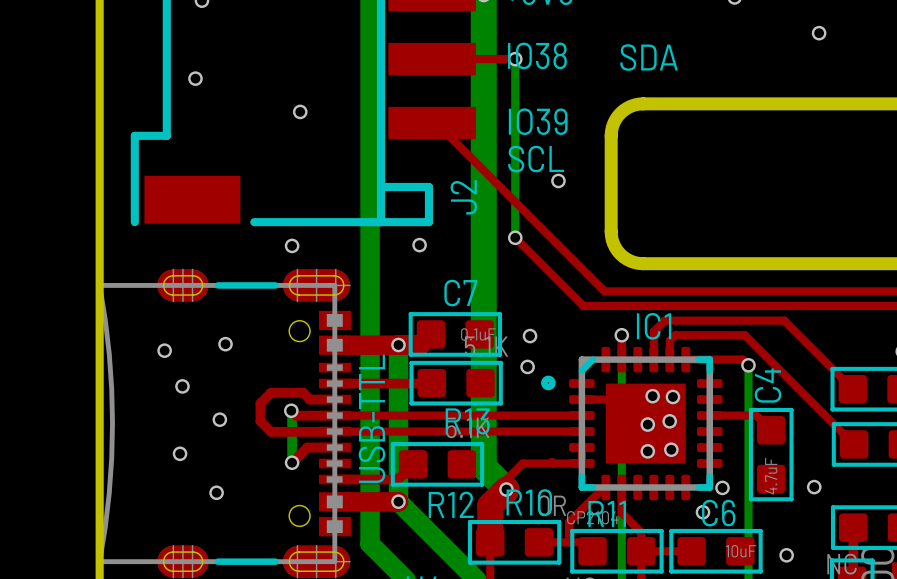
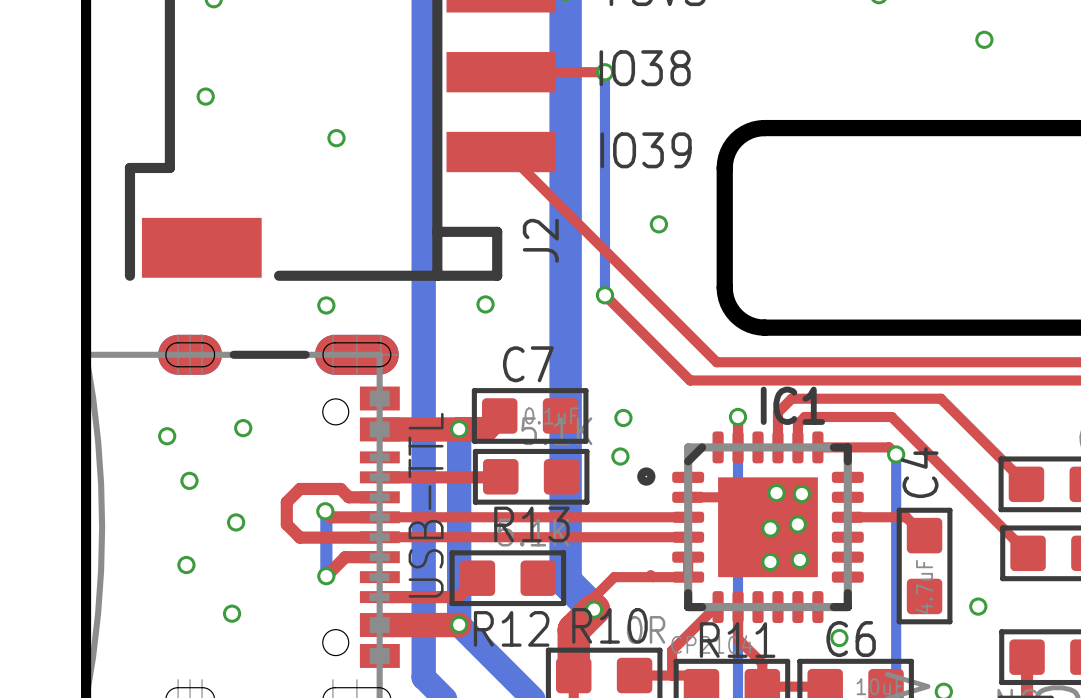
text: SDA (649, 57) -> none
text: SCL (536, 159) -> none
via: (722, 487) -> none

